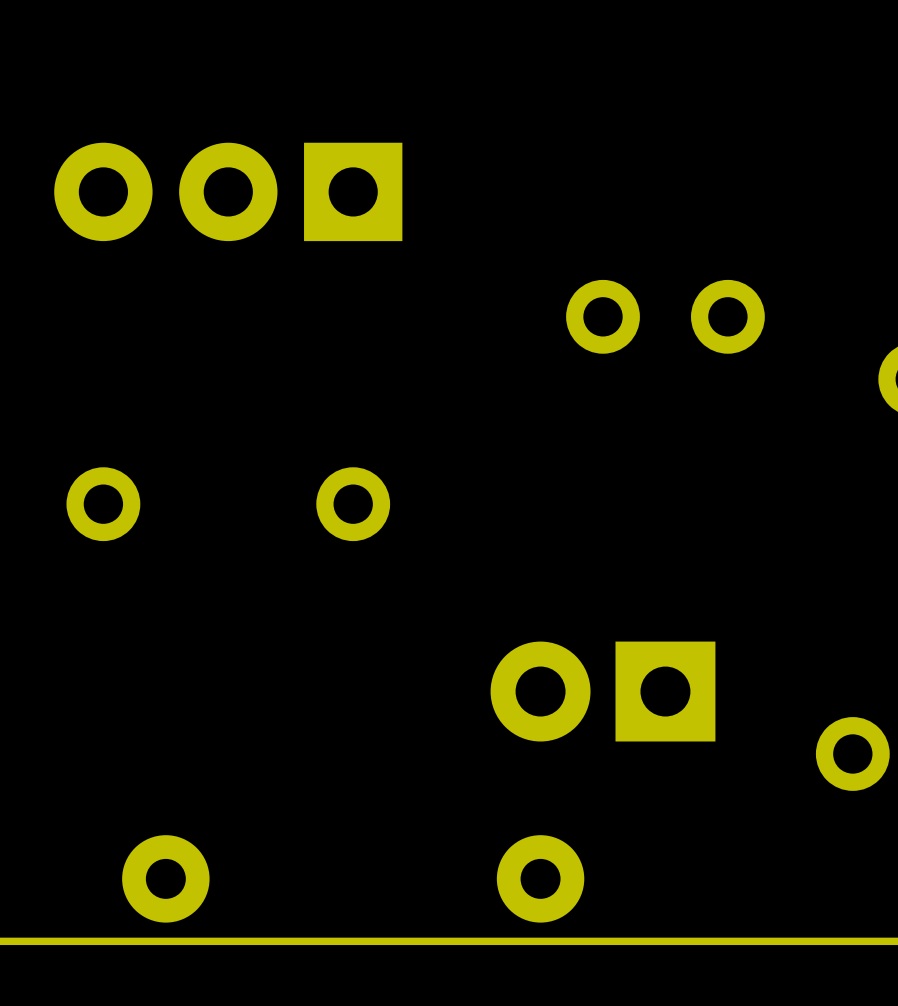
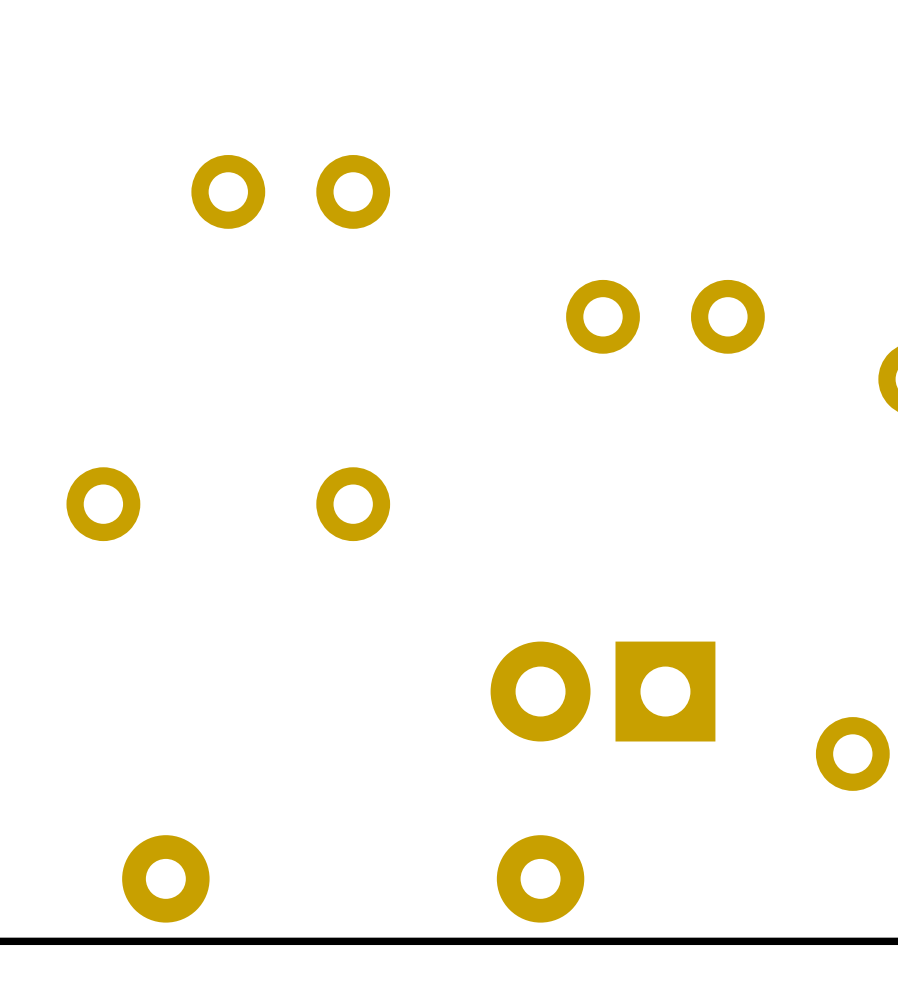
part: (228, 191) -> none
part: none -> (290, 191)

